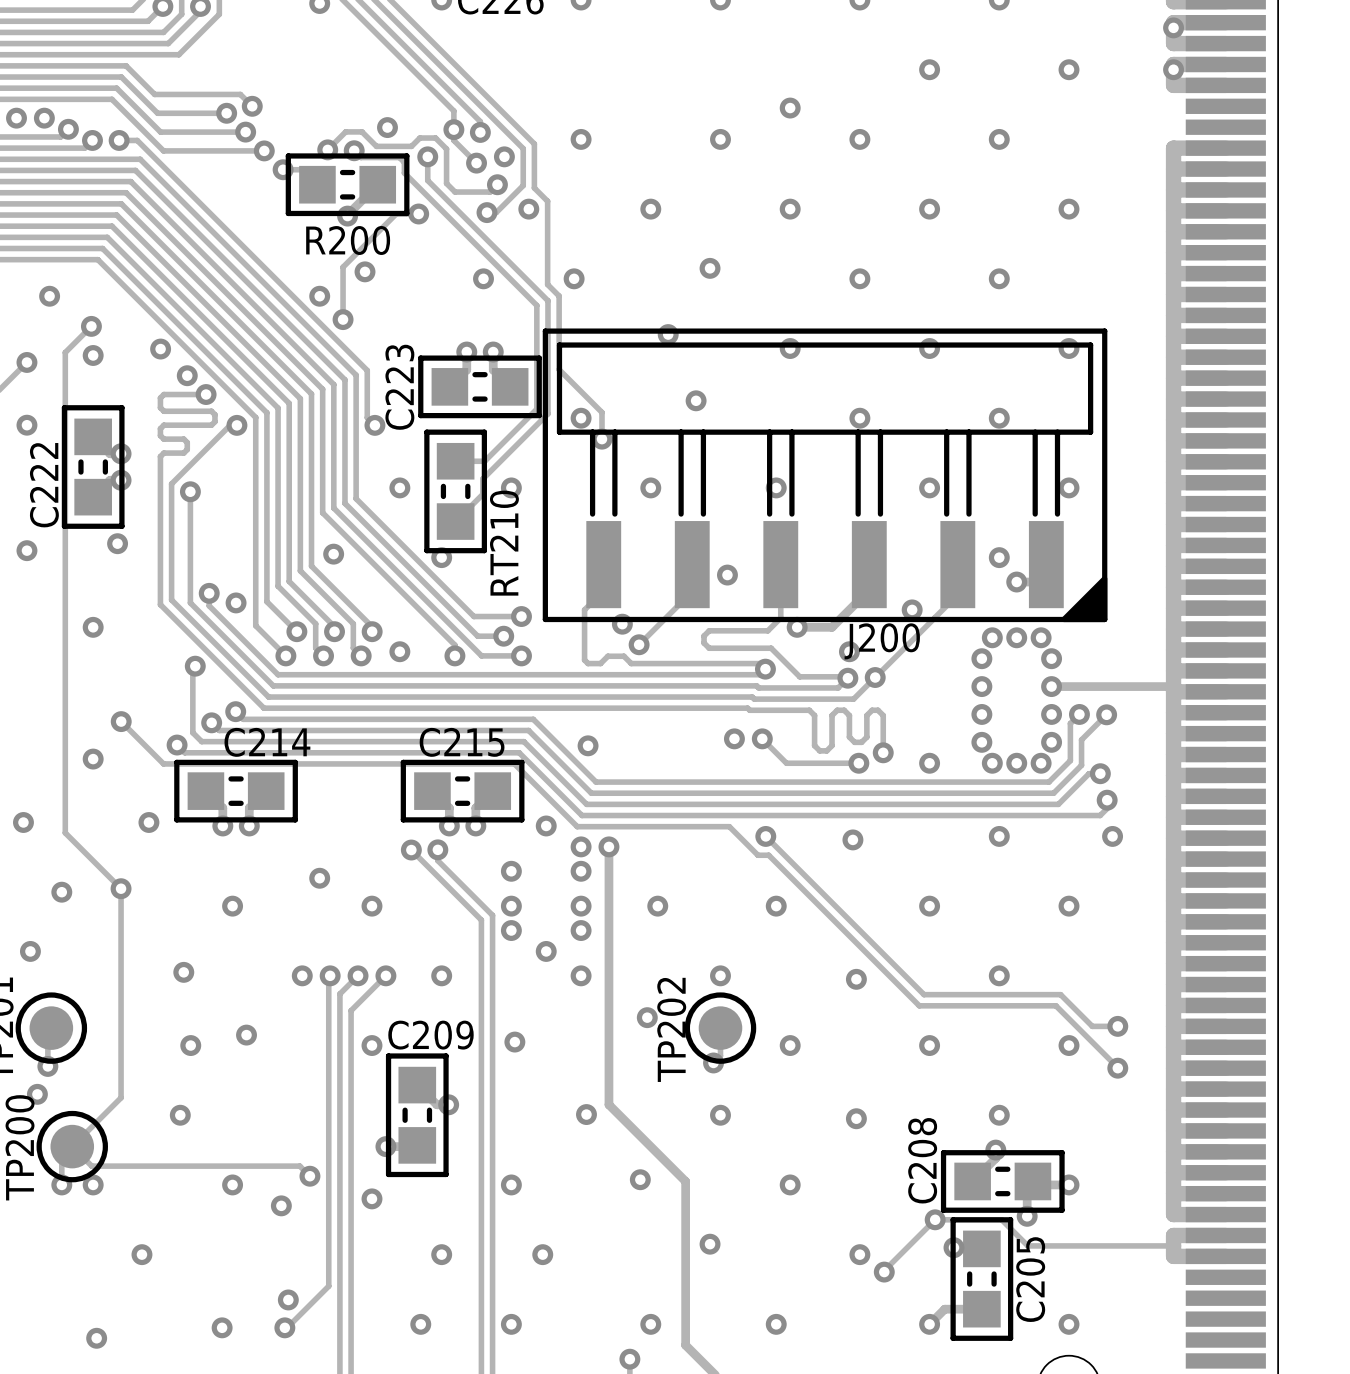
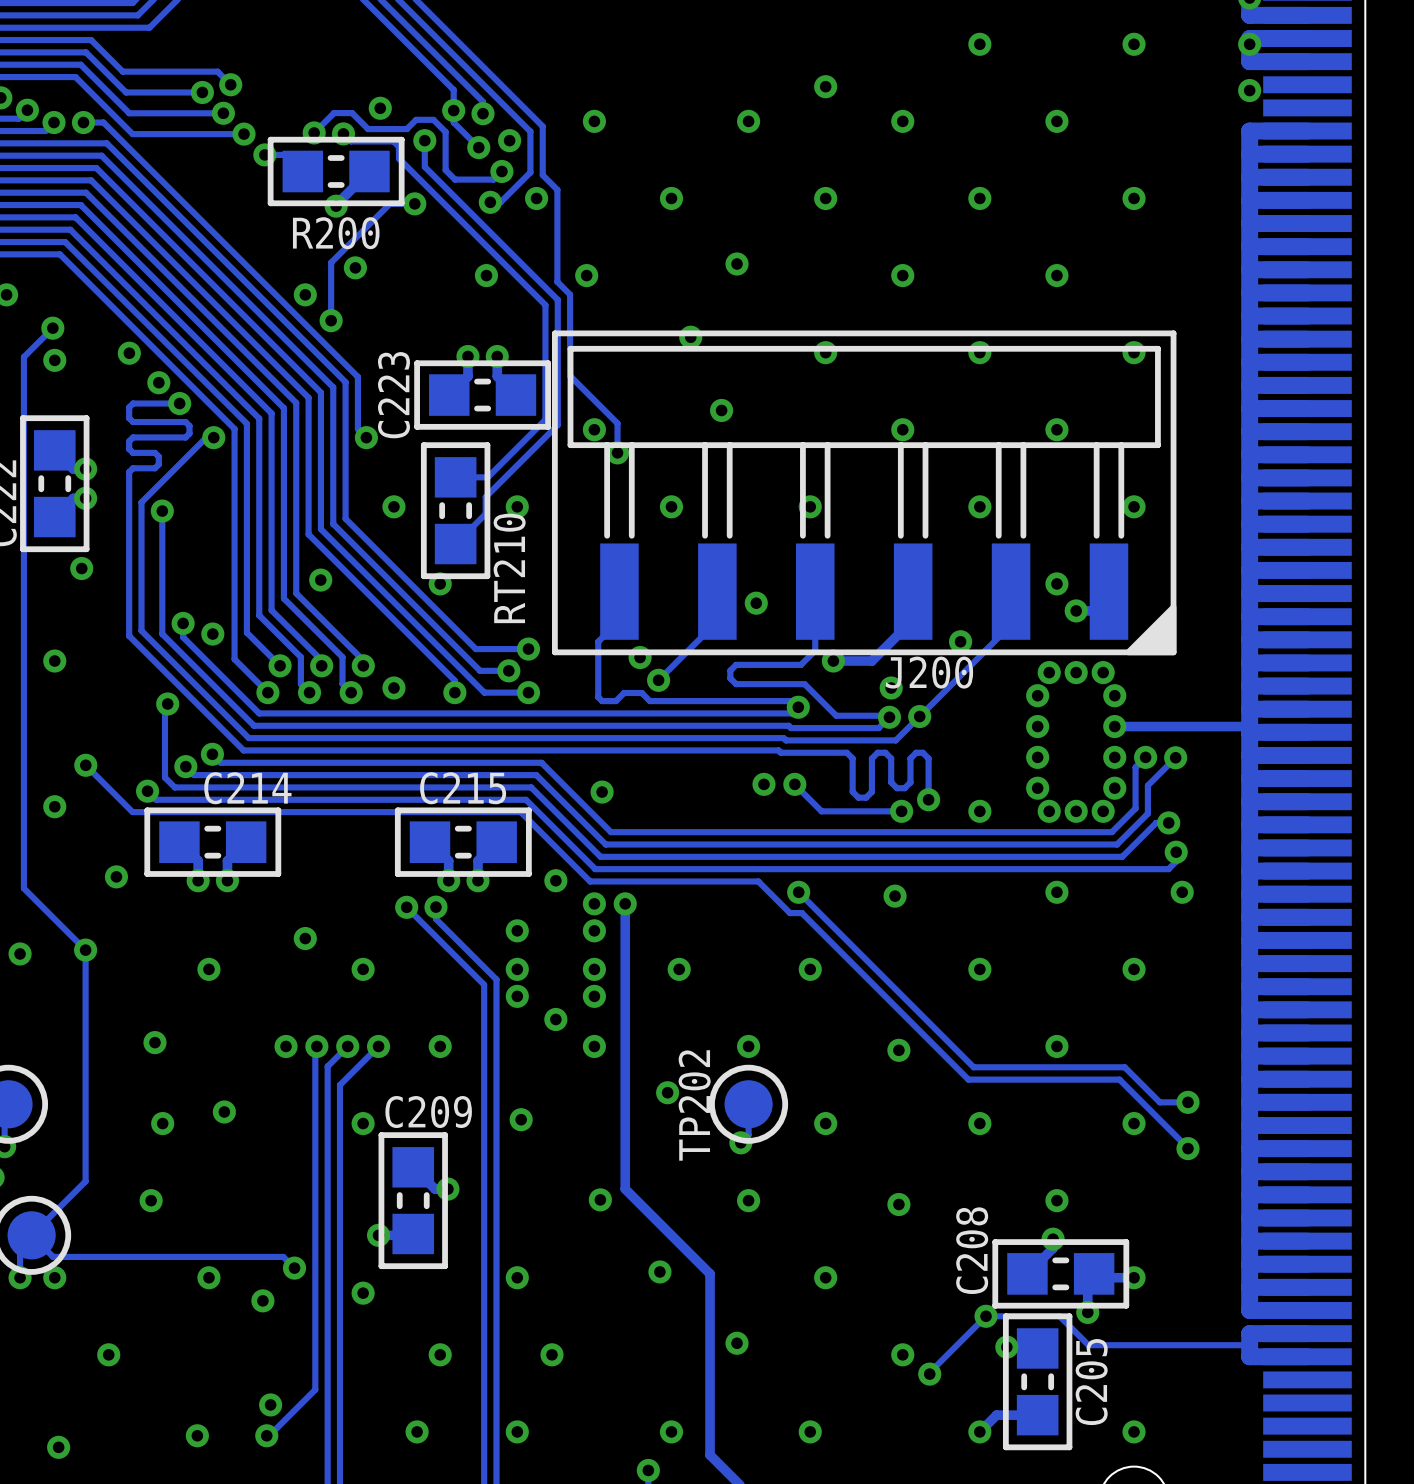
via: none -> (1249, 90)

